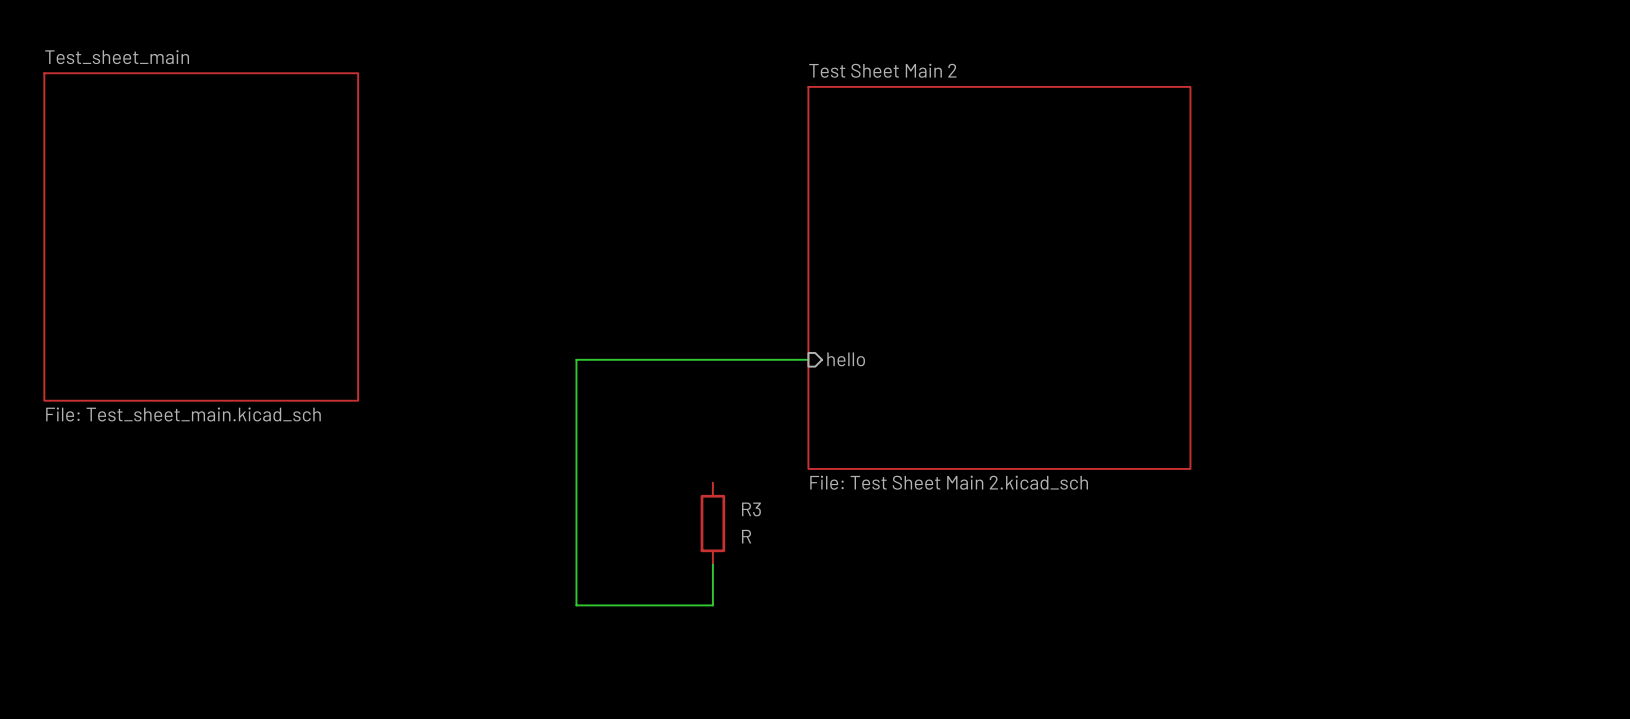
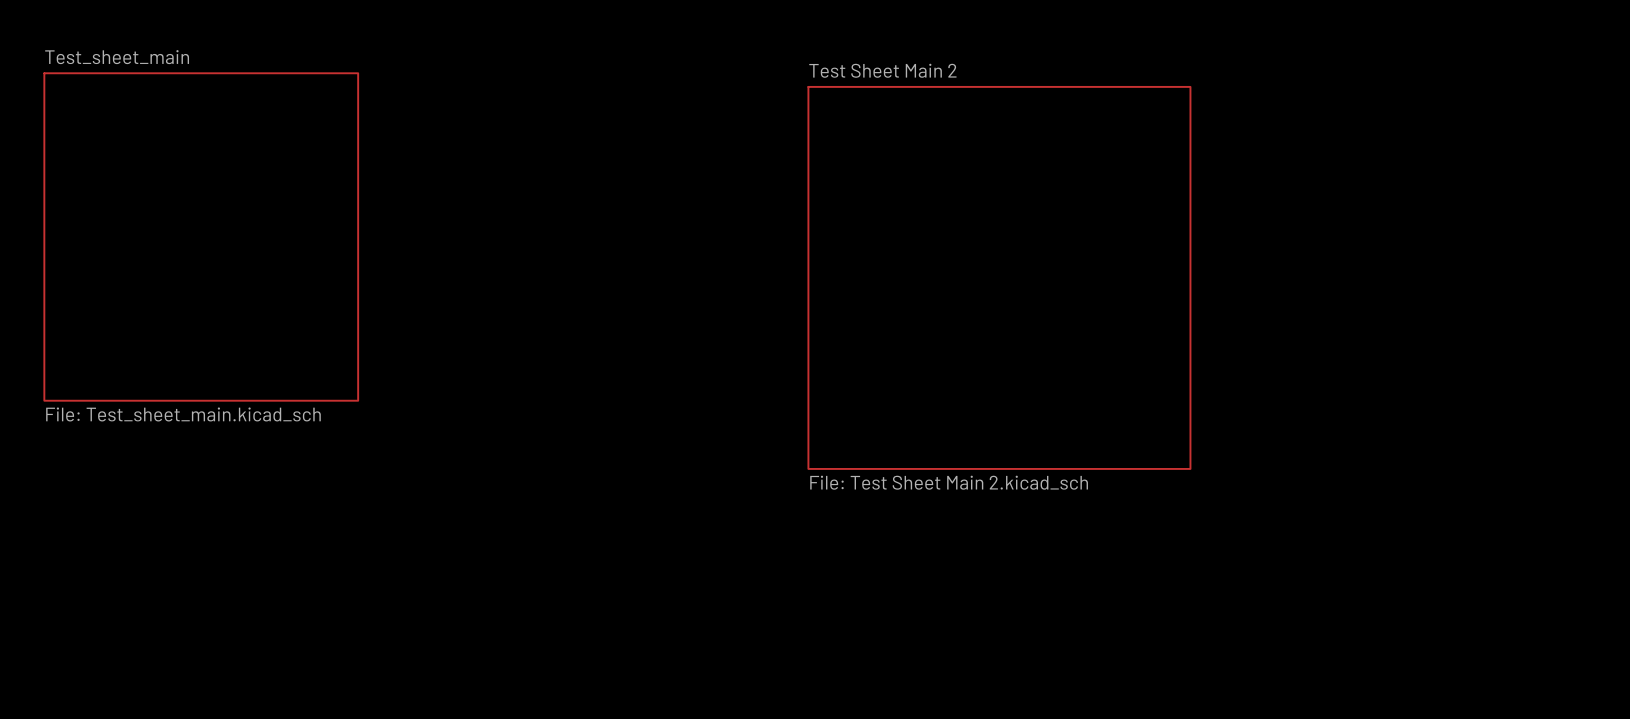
wire: (808, 359) (576, 359) (576, 605) (712, 605) (712, 564) -> none
sheet pin: hello (846, 359) -> none
R3: R (712, 523) -> none

